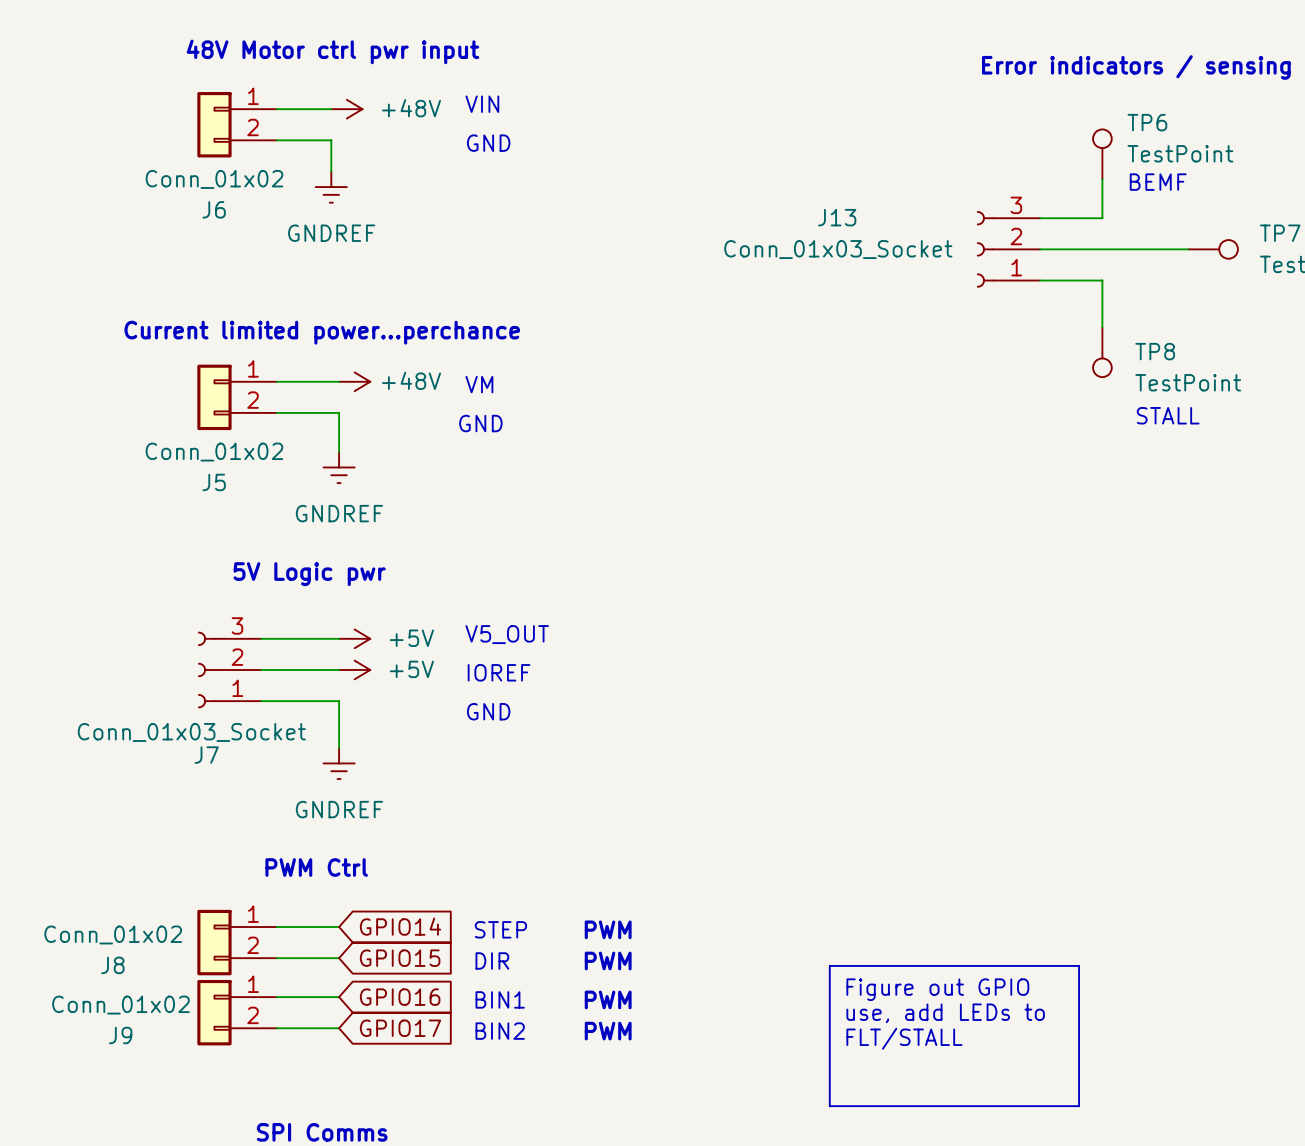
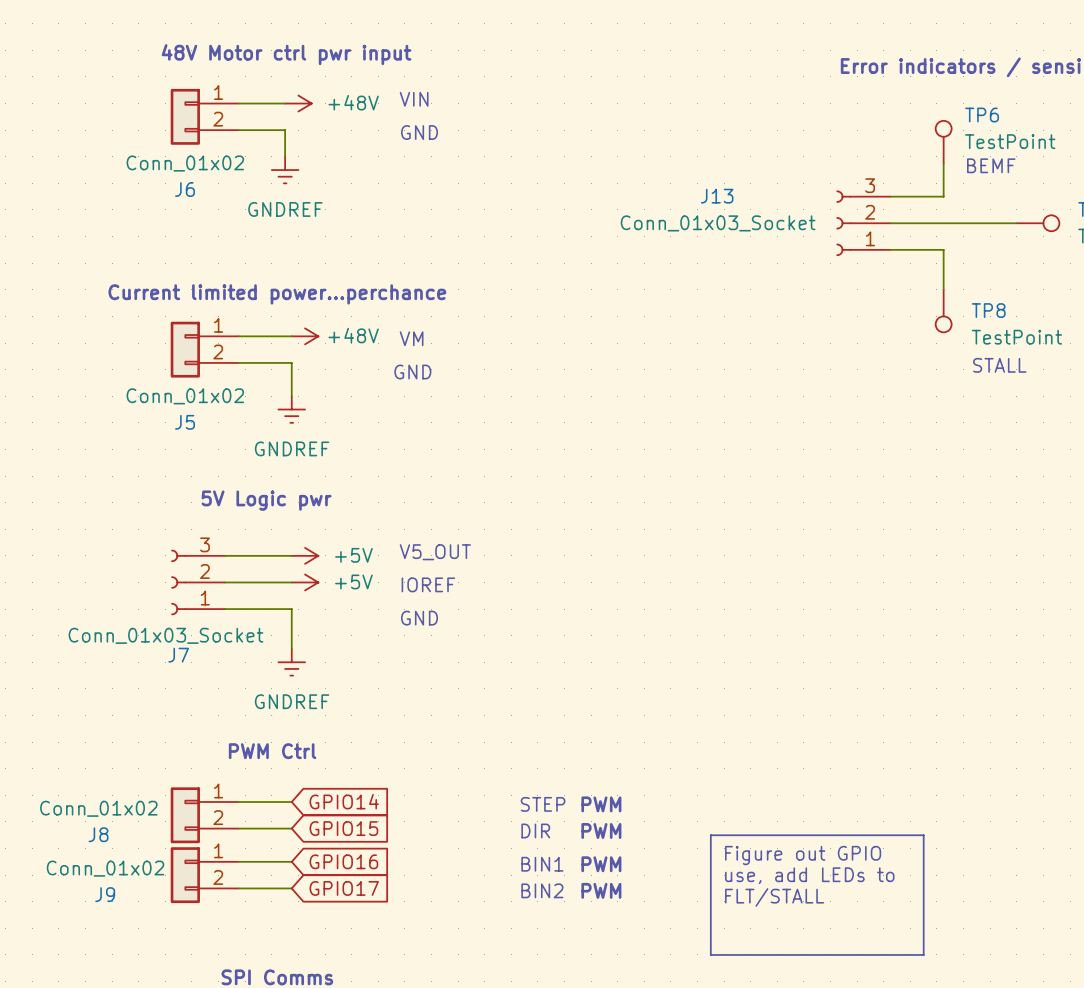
text position: STEP (500, 929) -> STEP (543, 804)
text: PWM (608, 929) -> none
text: none -> PWM (601, 804)
text position: DIR (492, 960) -> DIR (535, 830)
text: PWM (608, 960) -> none
text: none -> PWM (601, 830)
text position: BIN1 (500, 999) -> BIN1 (542, 864)
text: PWM (608, 999) -> none
text: none -> PWM (601, 864)
text position: BIN2 (500, 1031) -> BIN2 (542, 890)
text: PWM (608, 1031) -> none
text: none -> PWM (601, 890)

